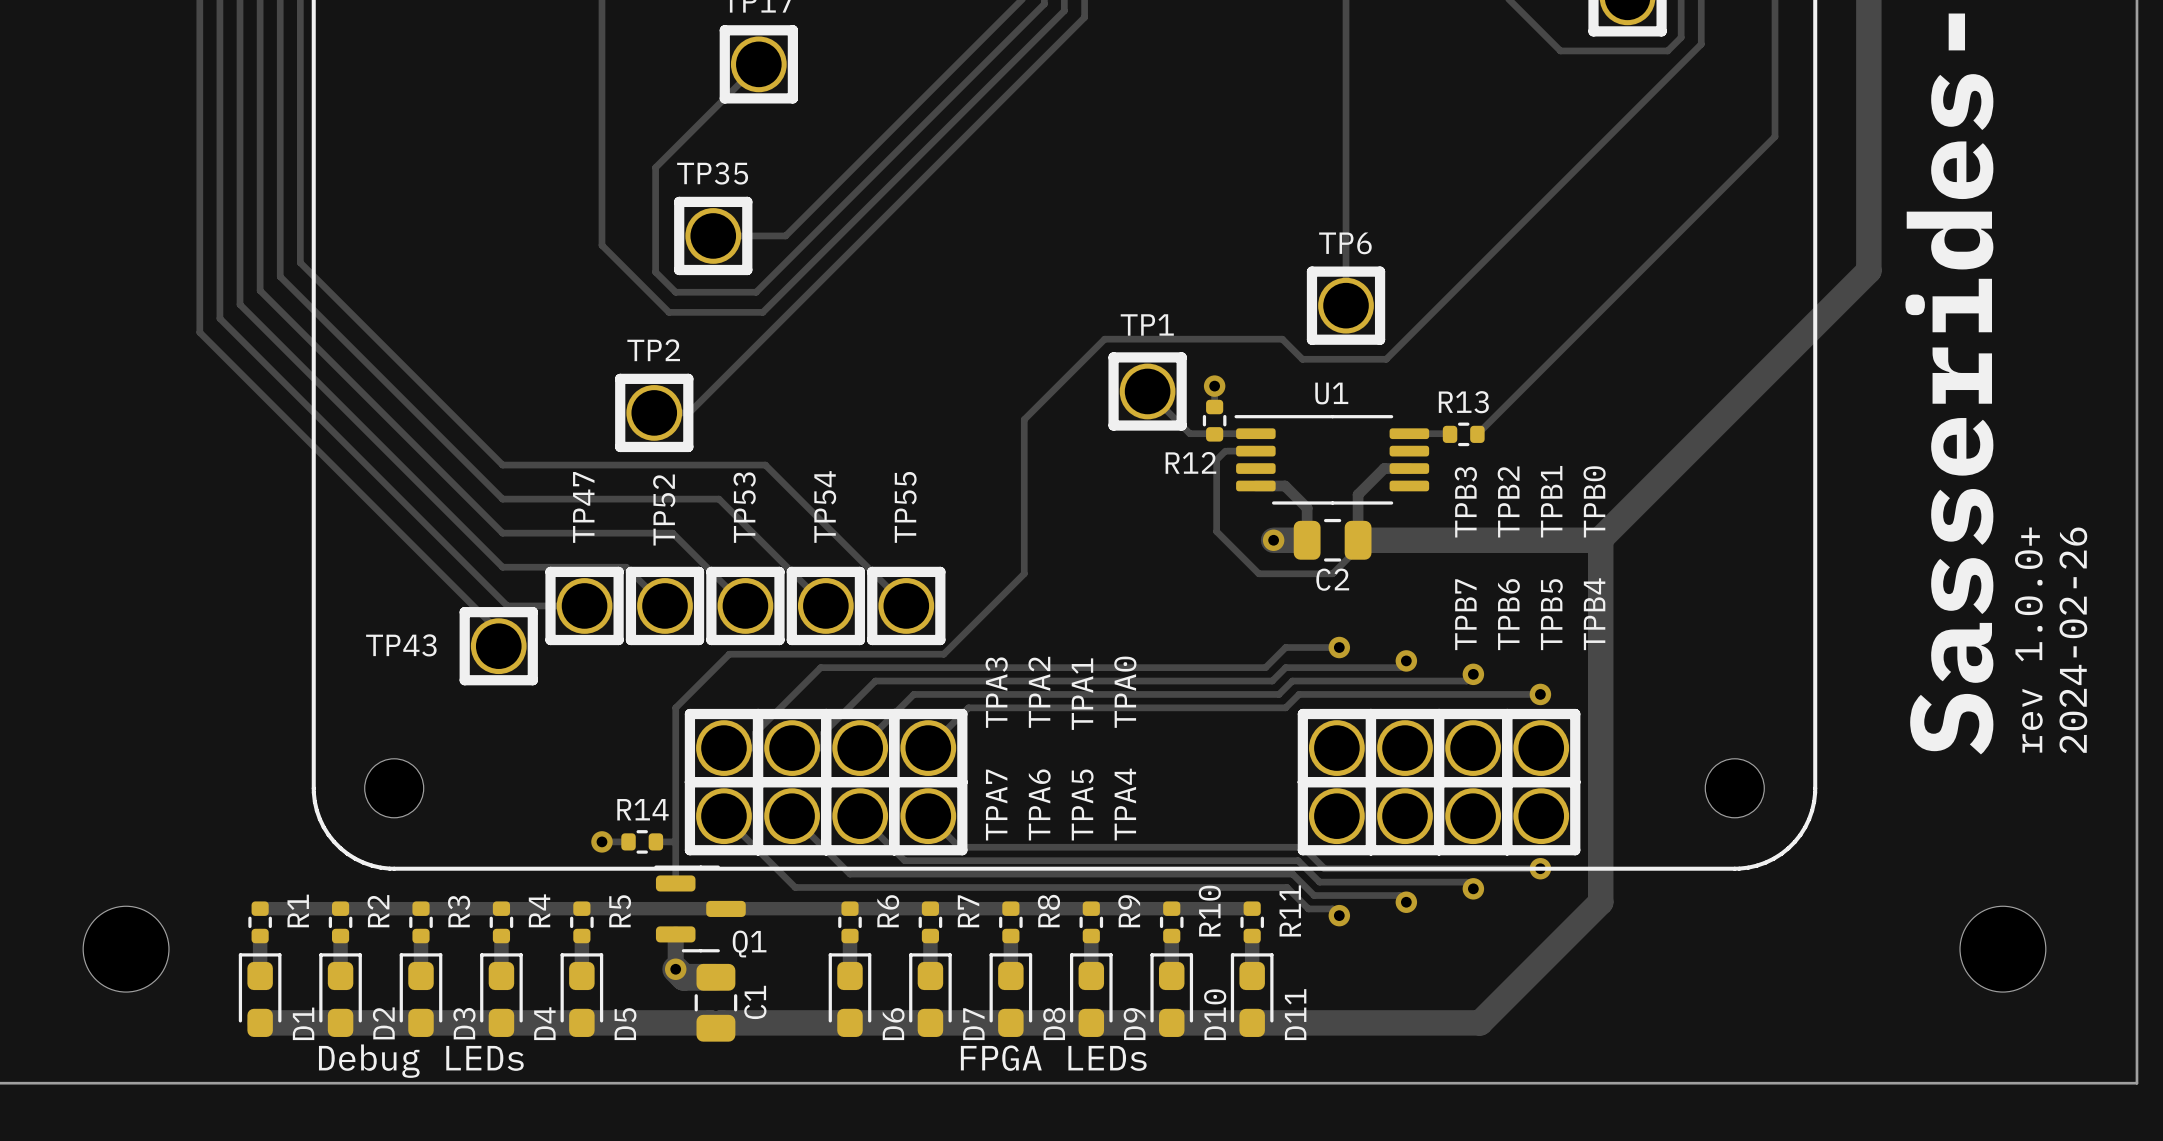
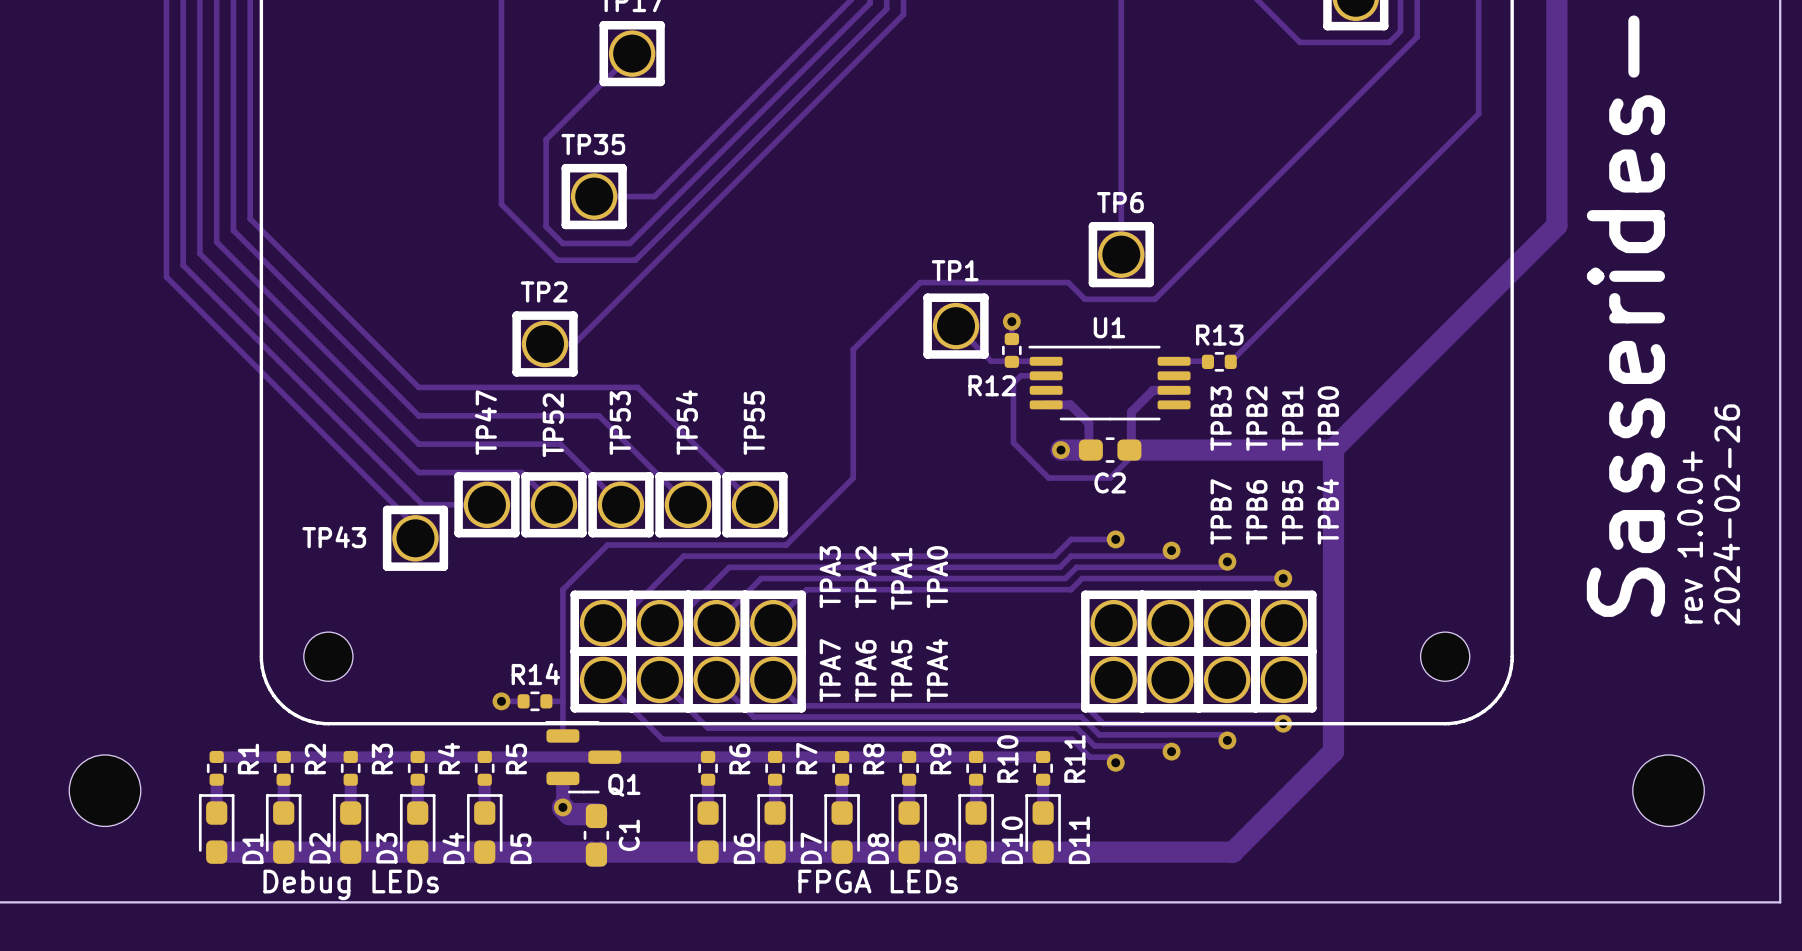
C2 footprint: [1293, 518, 1372, 562] -> [1078, 437, 1142, 463]
C1 footprint: [694, 963, 738, 1042] -> [583, 804, 610, 867]

